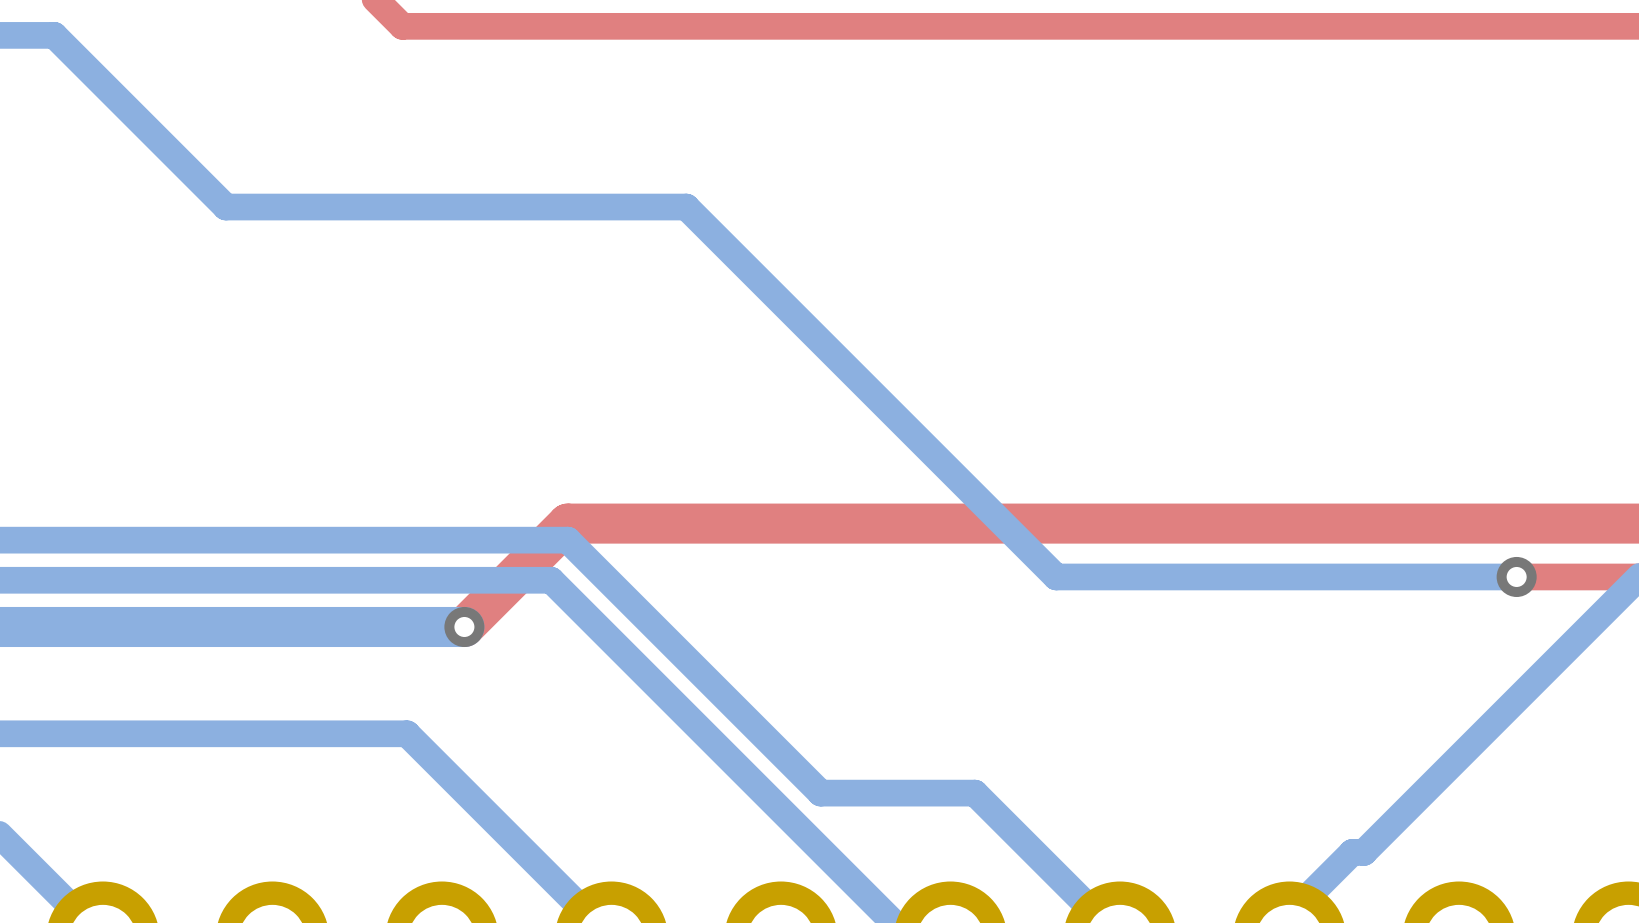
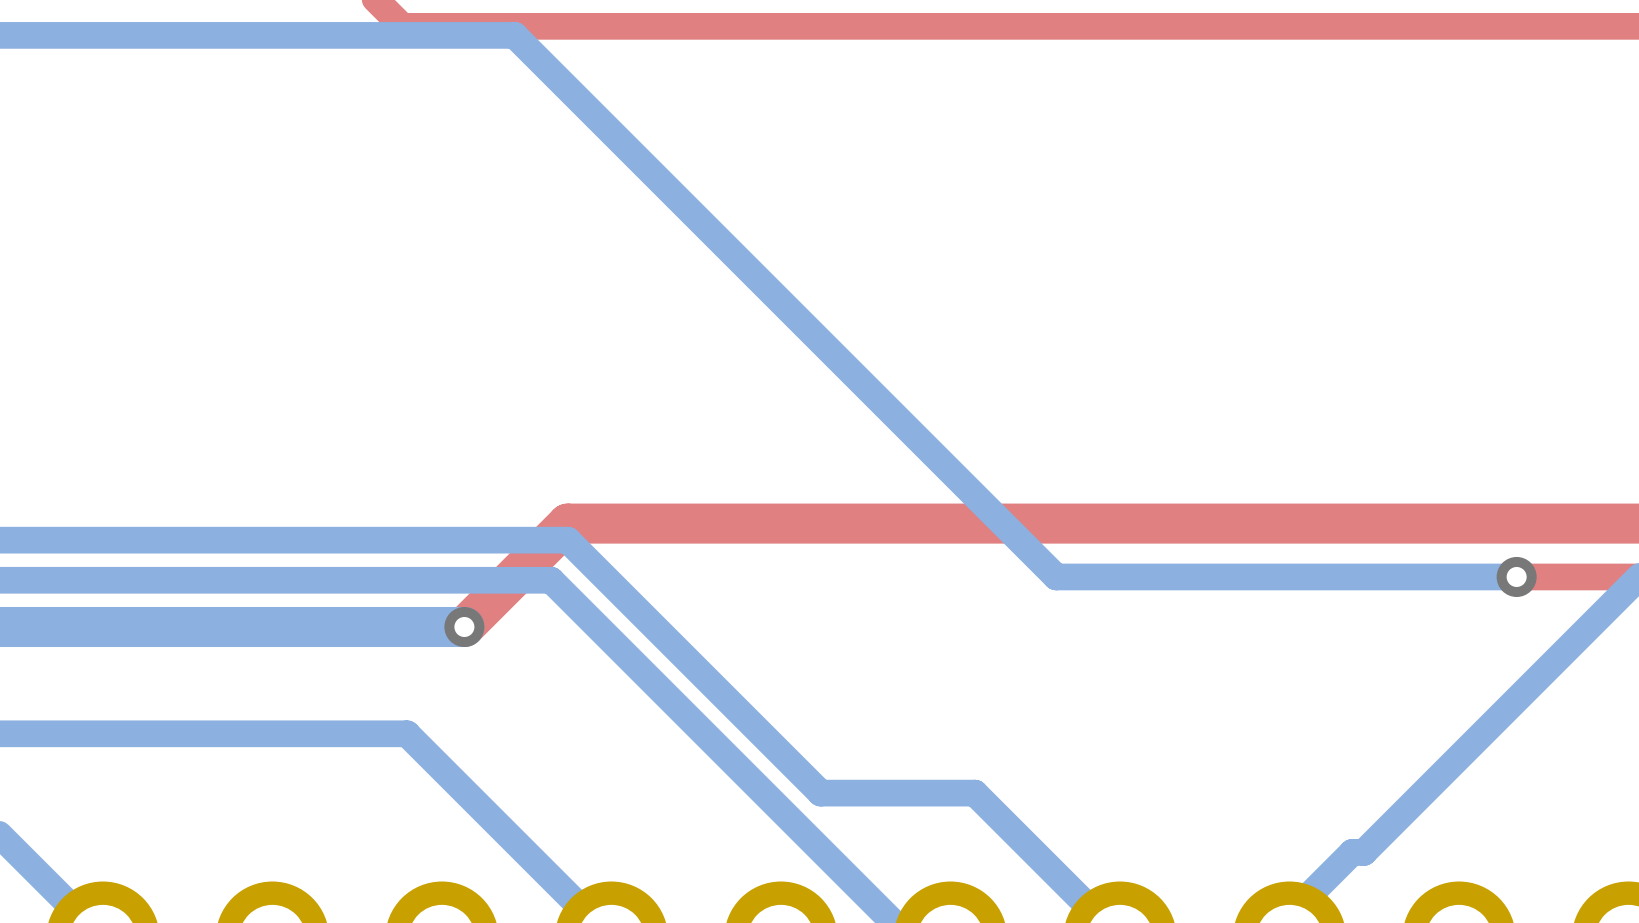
bottom track: (54, 35) (225, 207) (686, 207) -> (54, 35) (514, 35) (686, 207)

